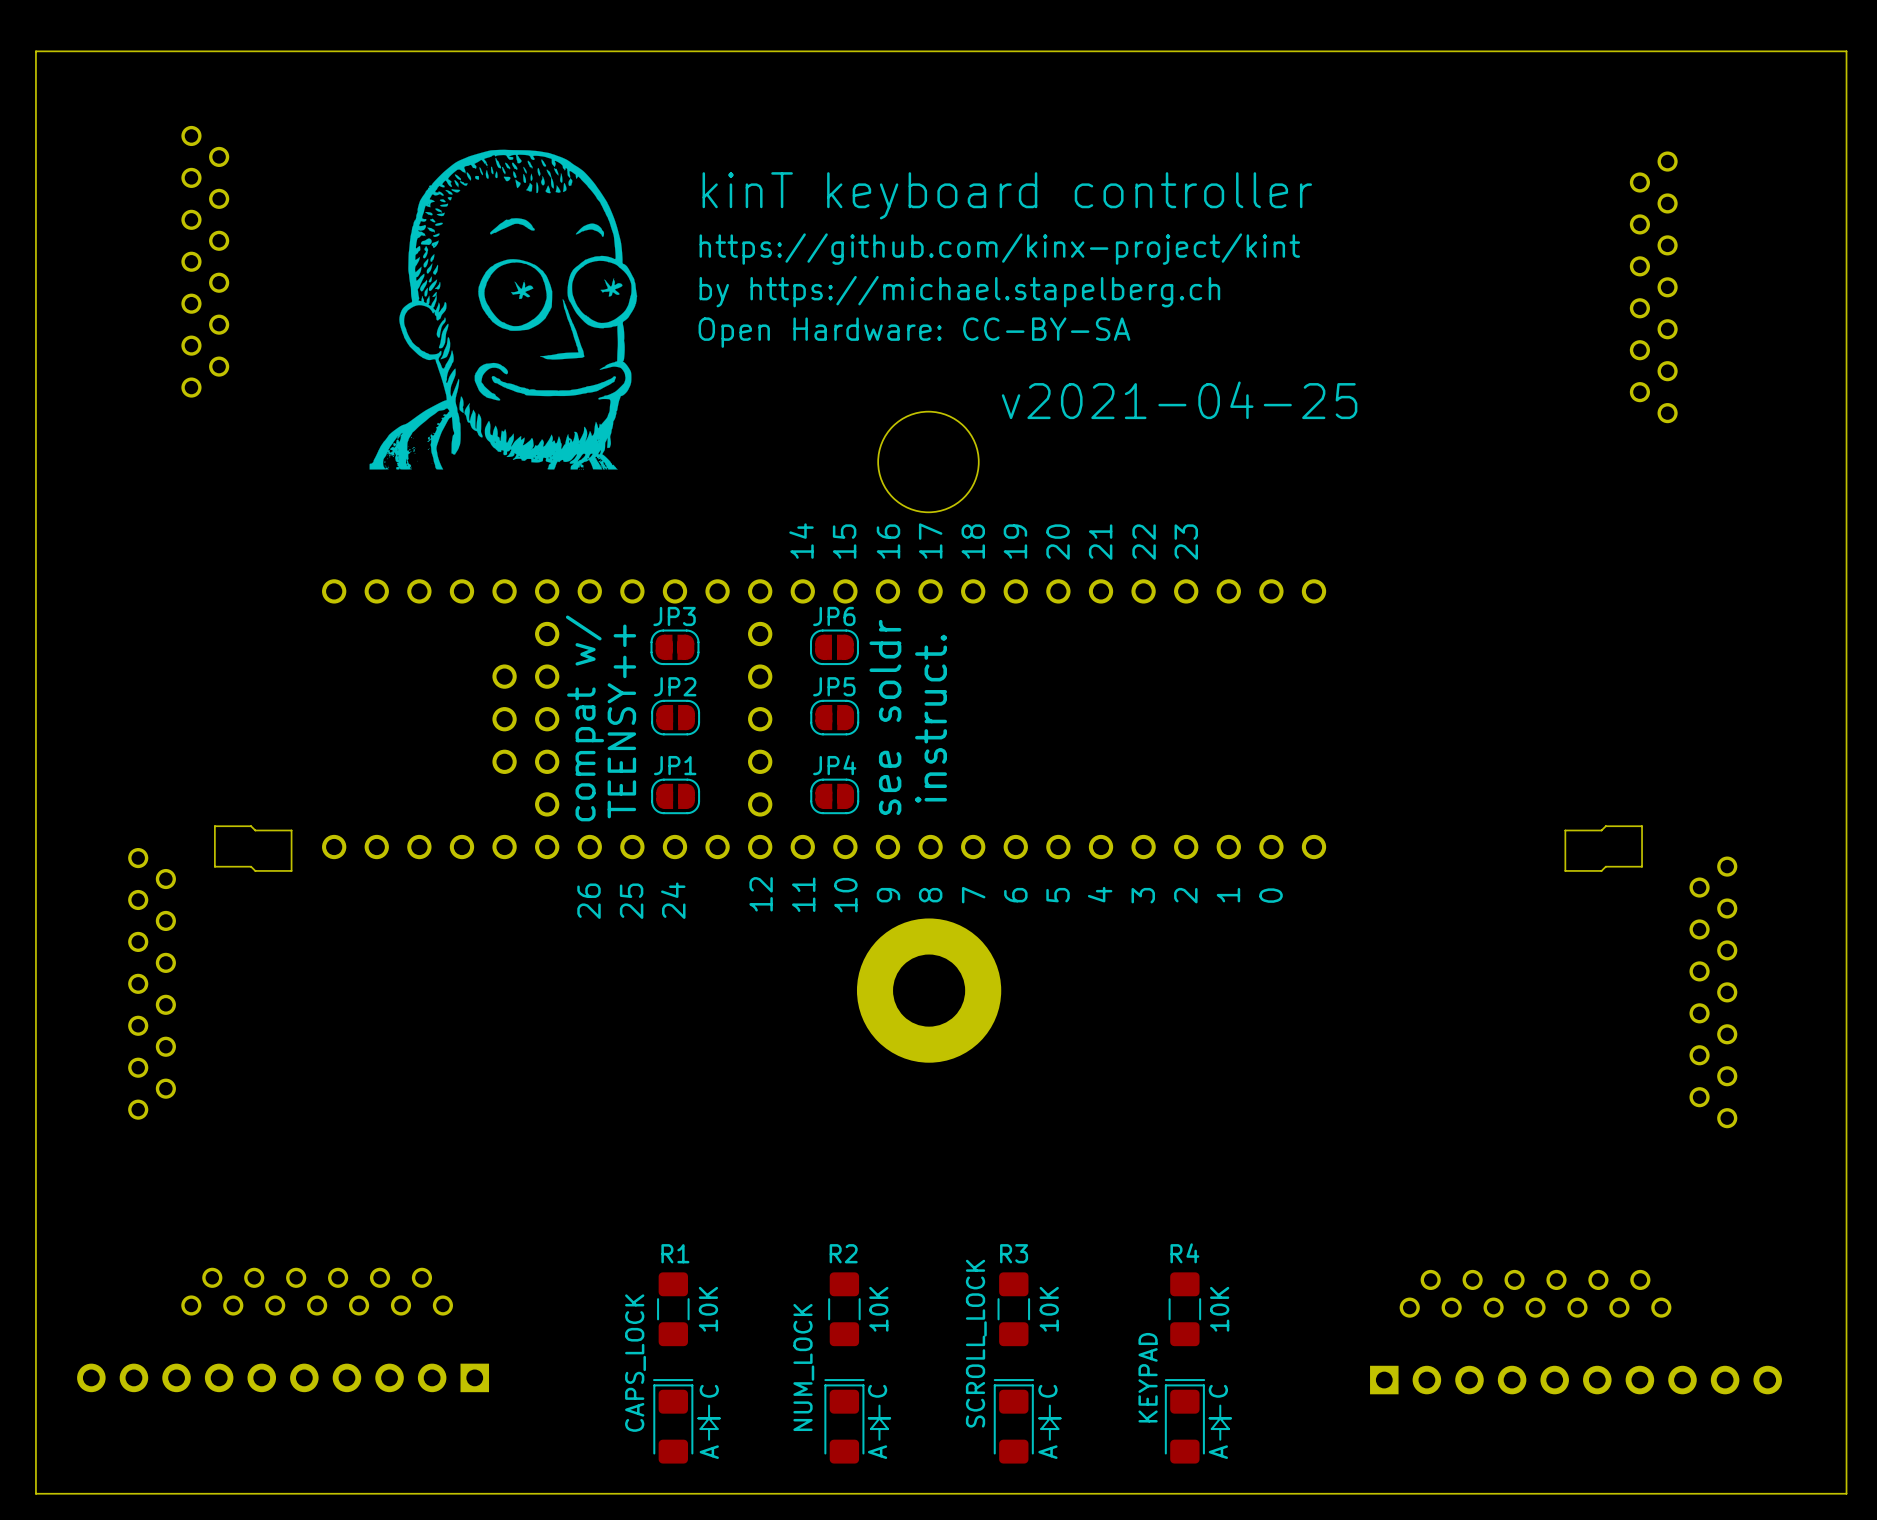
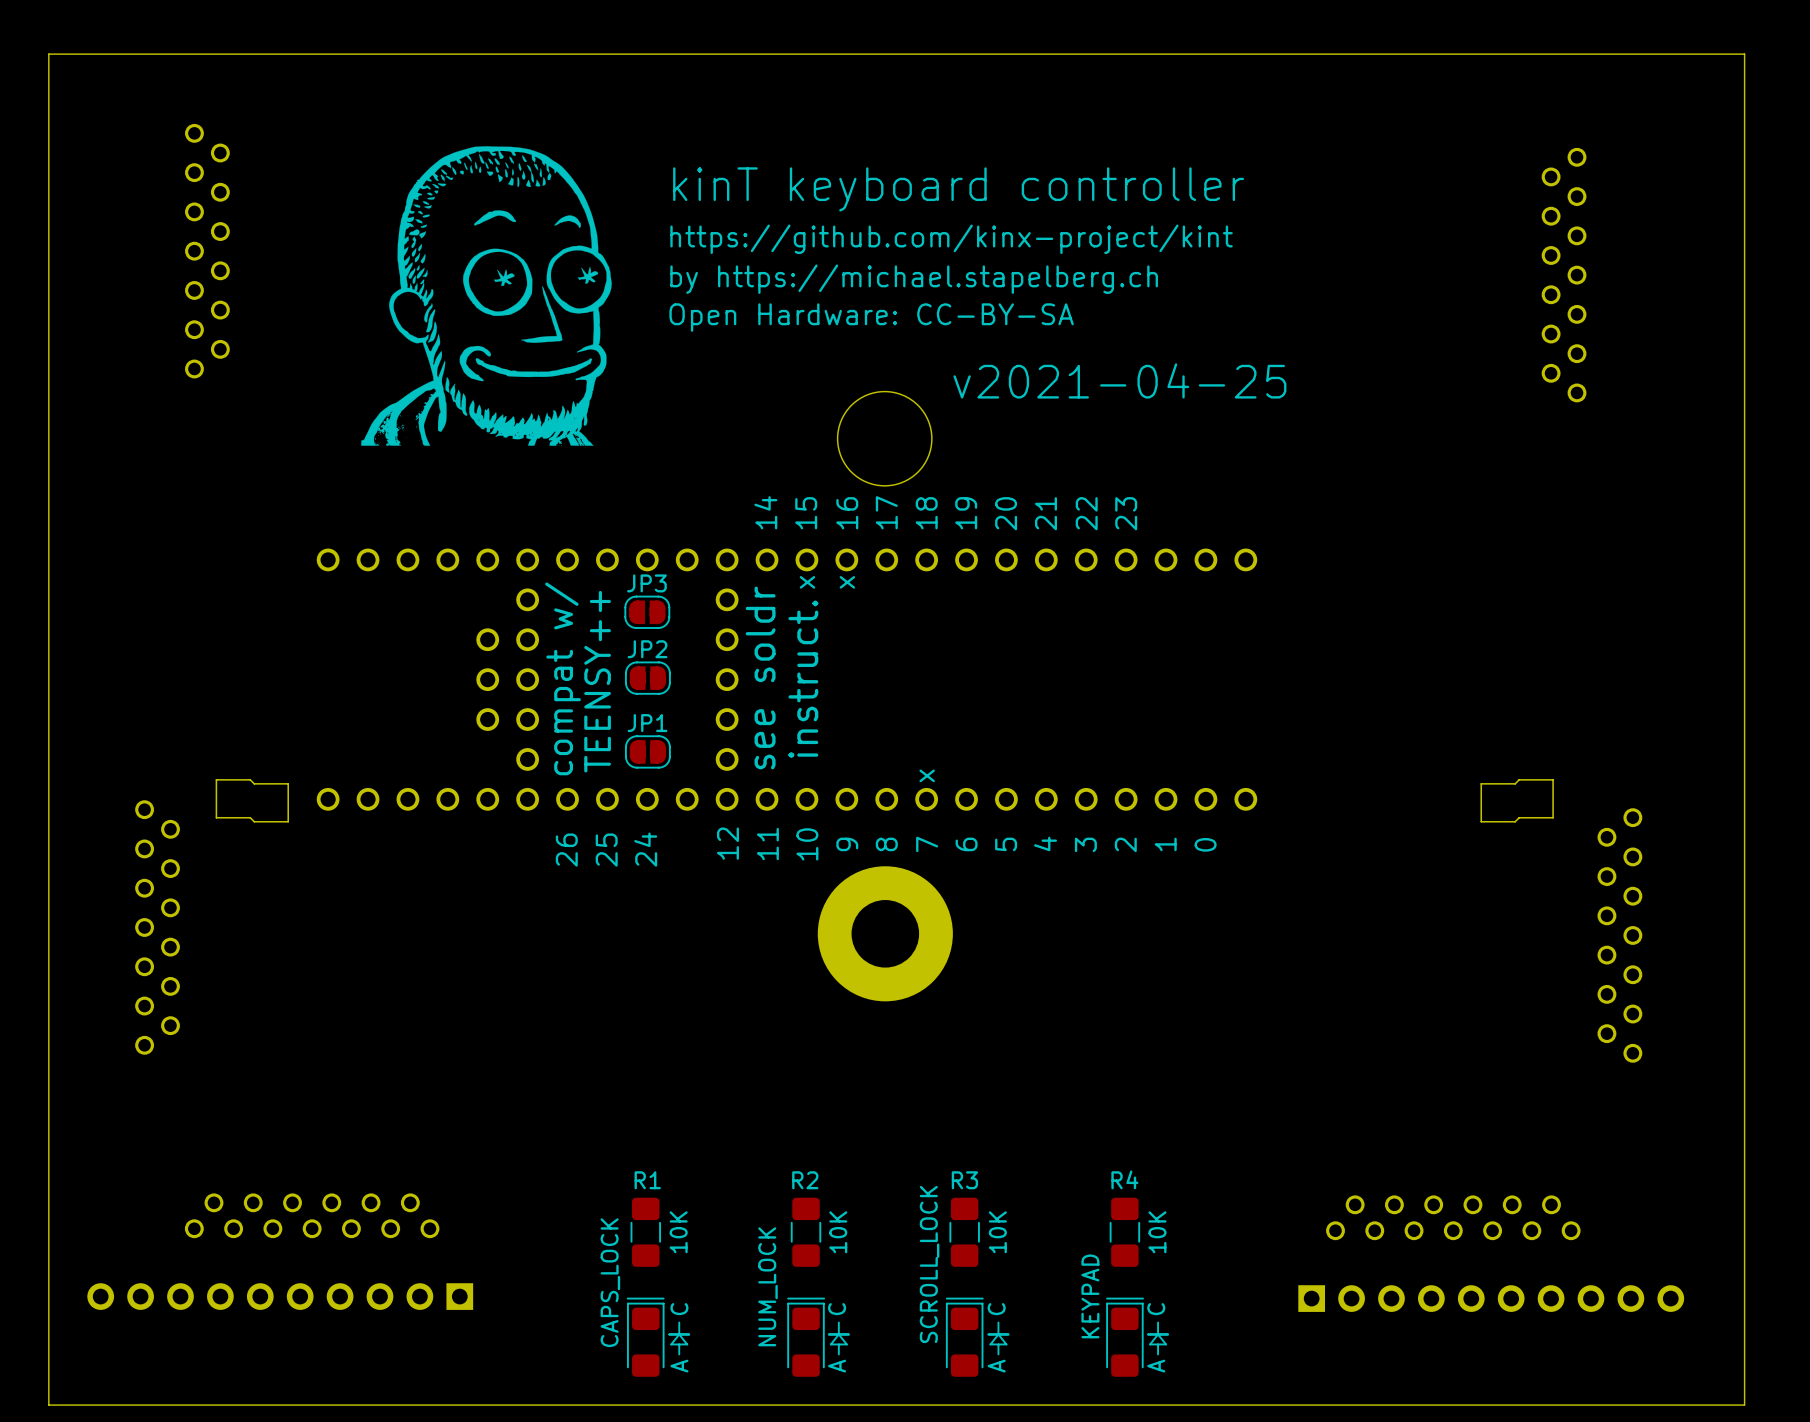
text: none -> x (807, 582)
text: none -> x (847, 582)
JP6: (834, 647) -> none
JP5: (834, 717) -> none
part text position: see soldr (885, 717) -> see soldr (760, 677)
part text position: instruct. (931, 718) -> instruct. (803, 679)
JP4: (834, 796) -> none
text: none -> x (927, 775)

